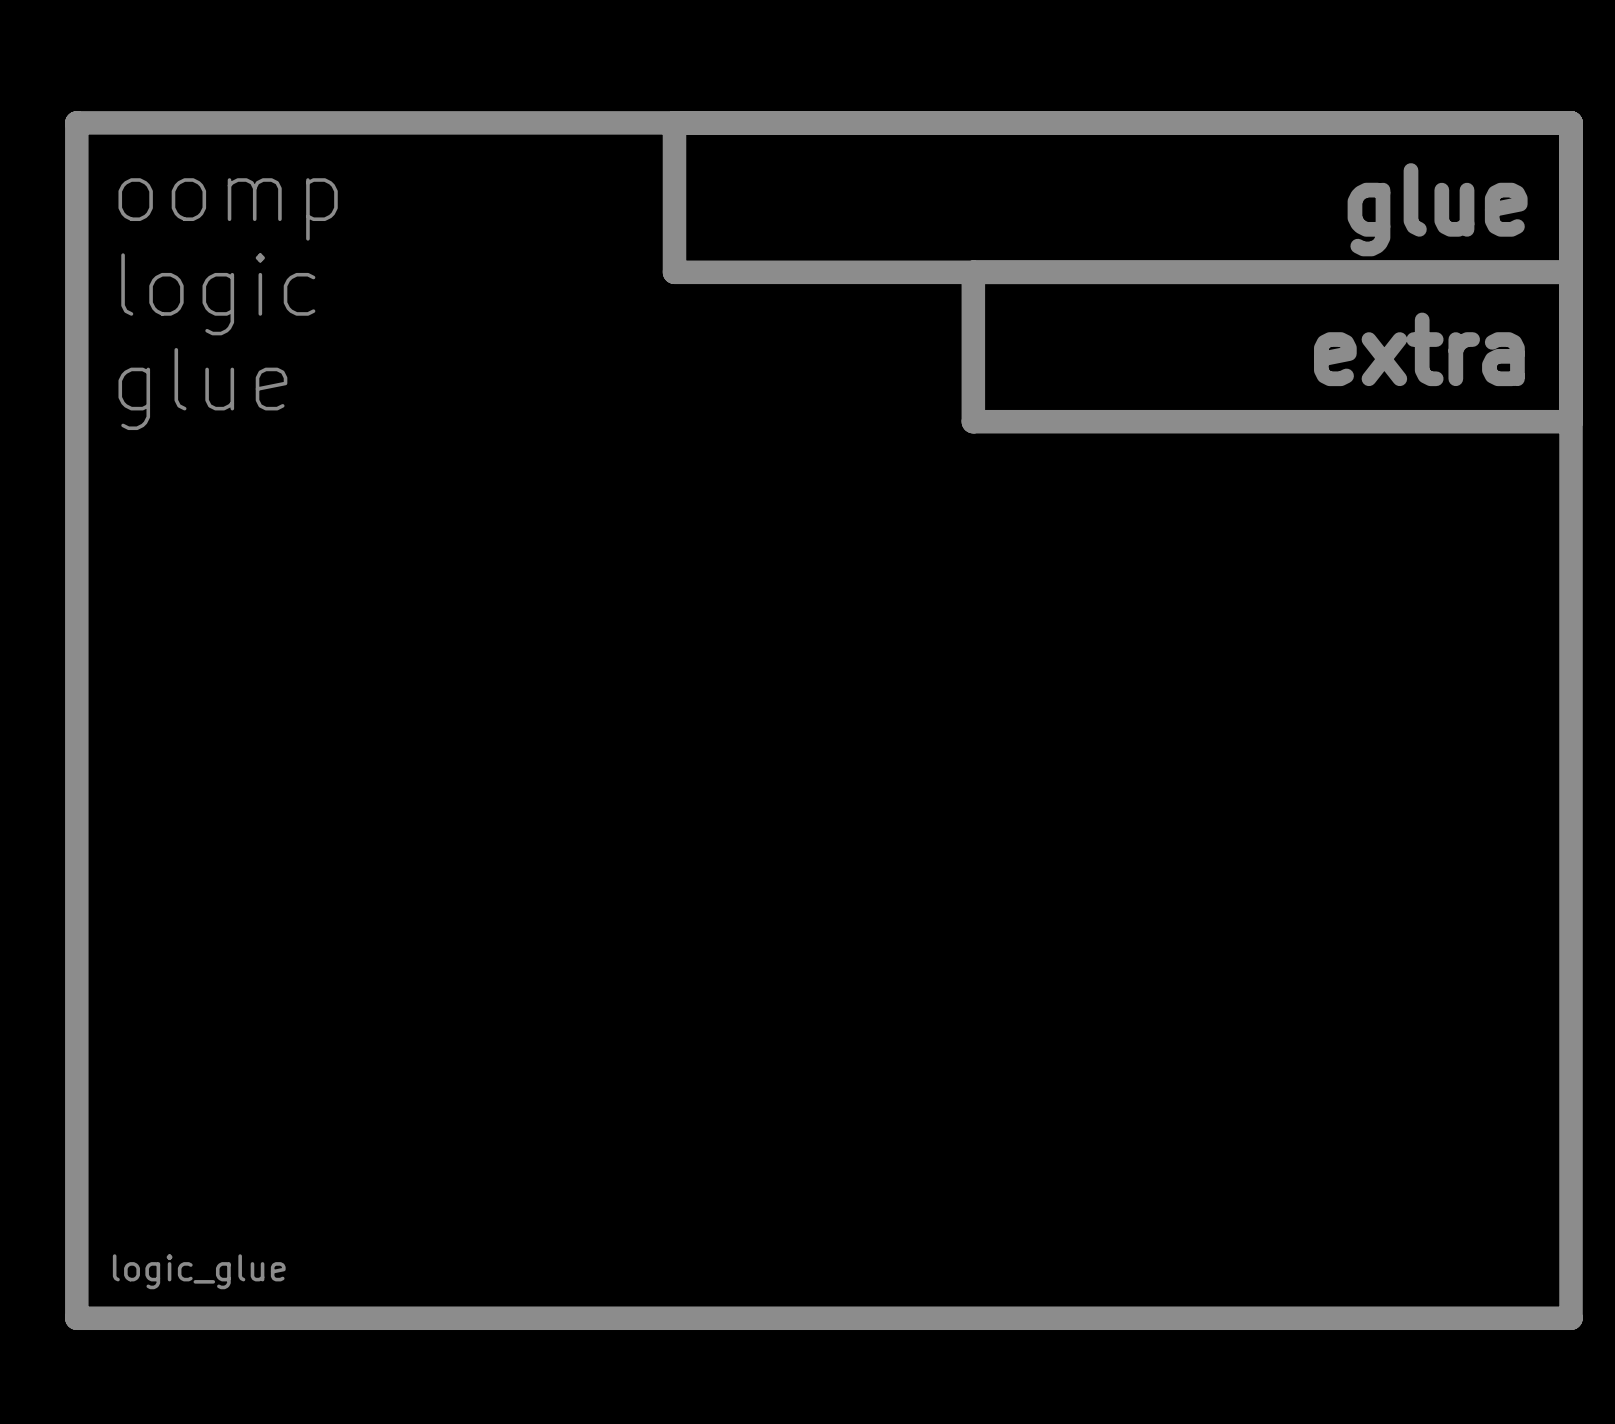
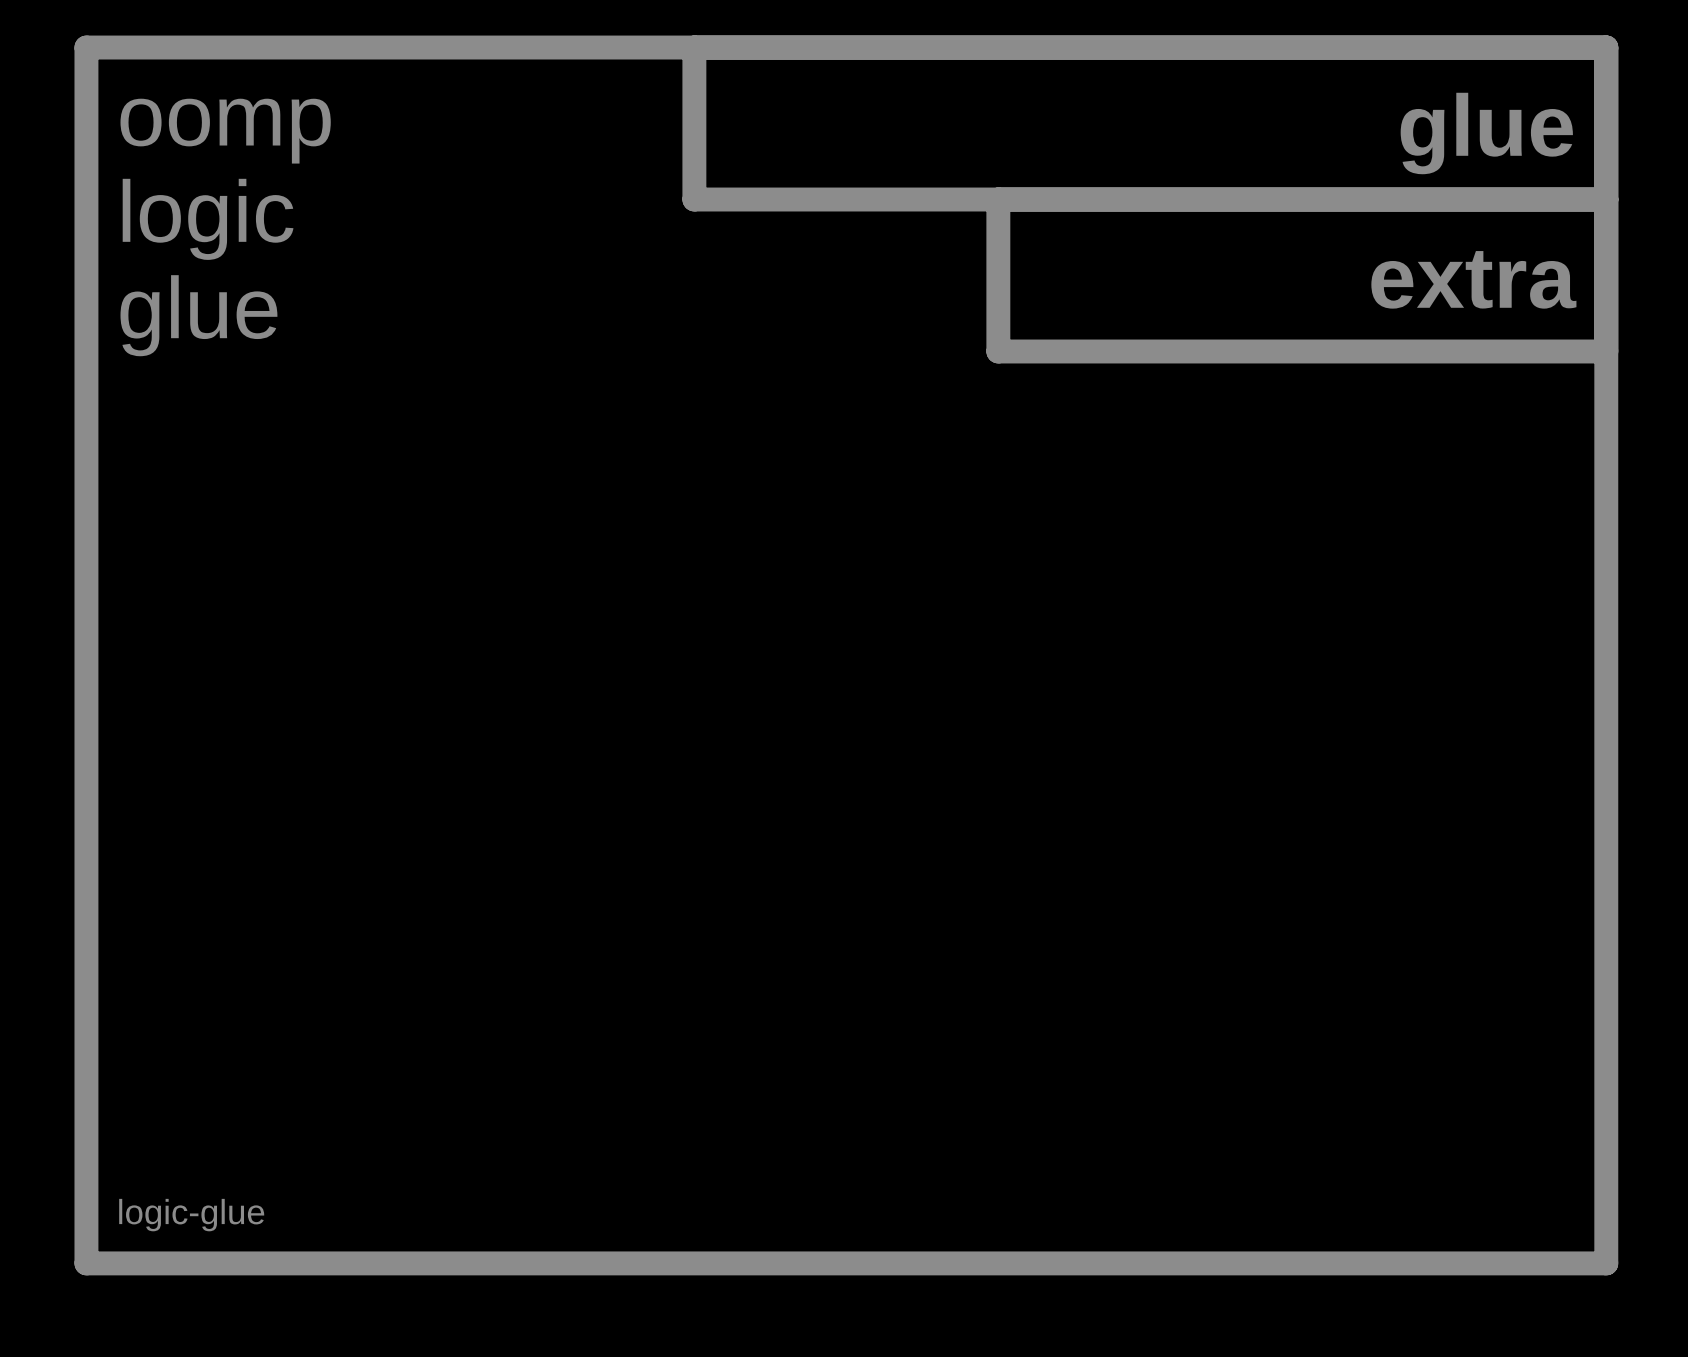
text: logic_glue (199, 1271) -> logic-glue (191, 1215)

